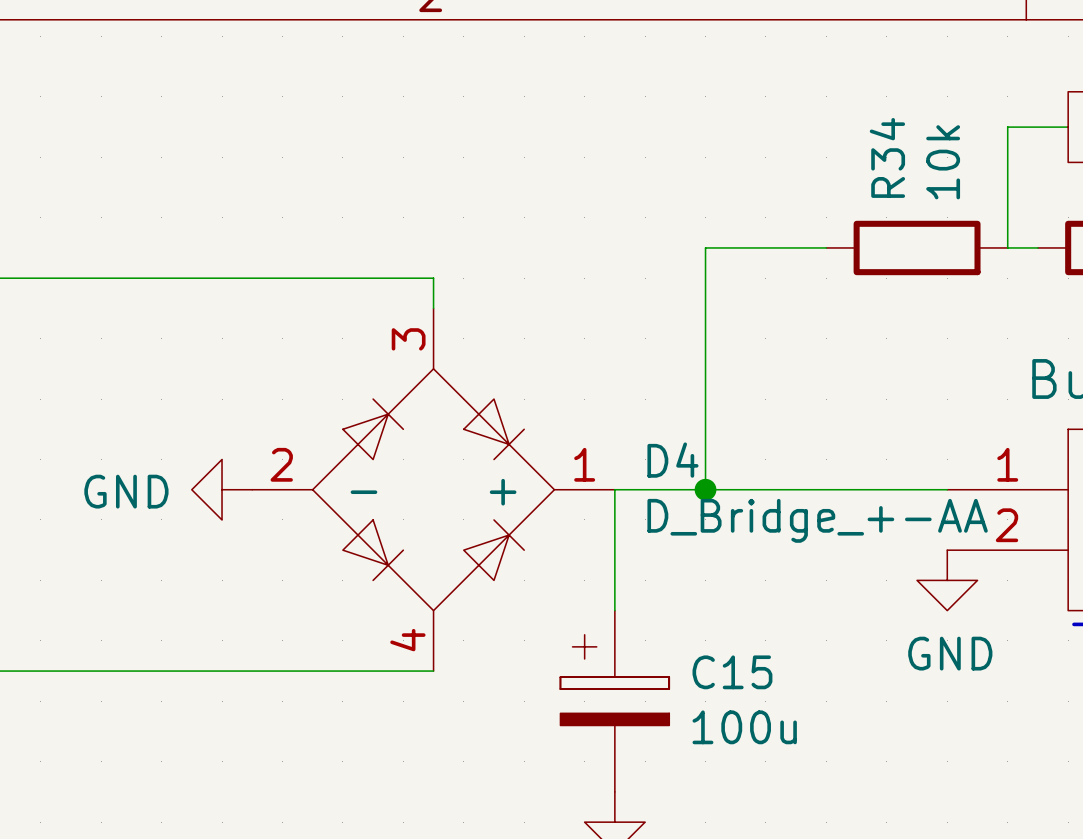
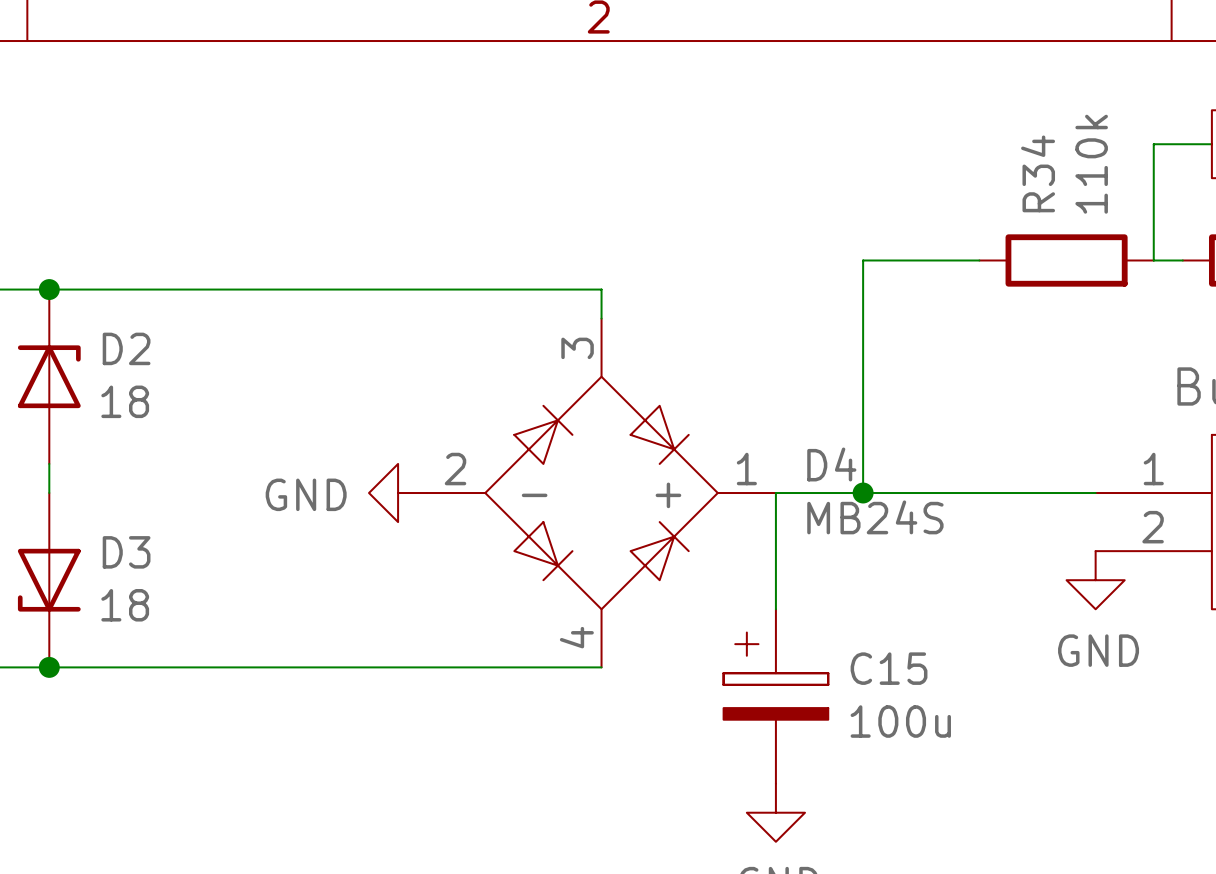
R34 value: 10k (943, 162) -> 110k (1091, 164)
D4 value: D_Bridge_+-AA (817, 520) -> MB24S (875, 517)

